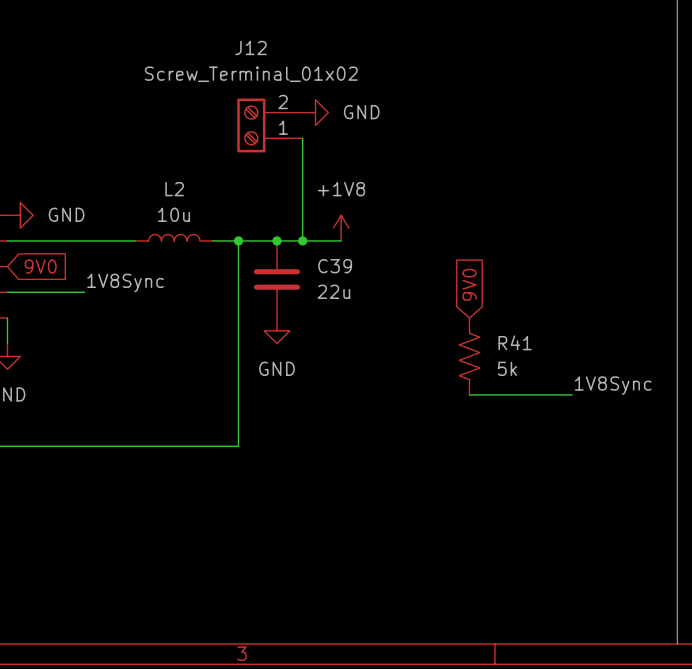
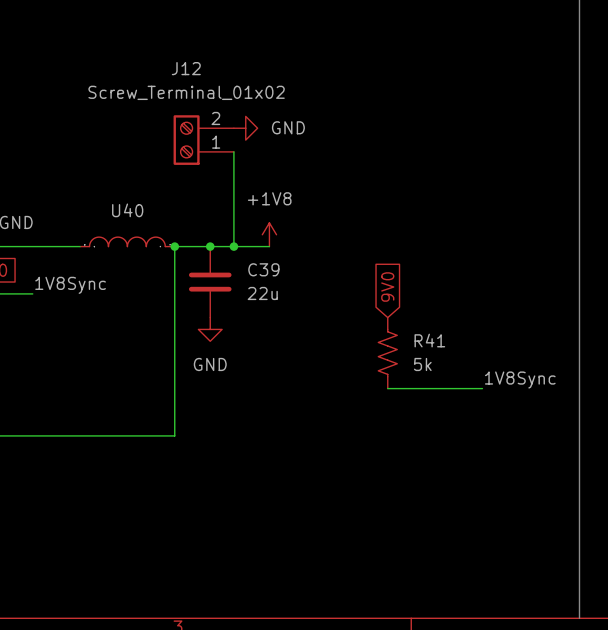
U40: none -> (127, 241)
L2: 10u (174, 237) -> none
wire: (212, 240) (238, 240) -> none

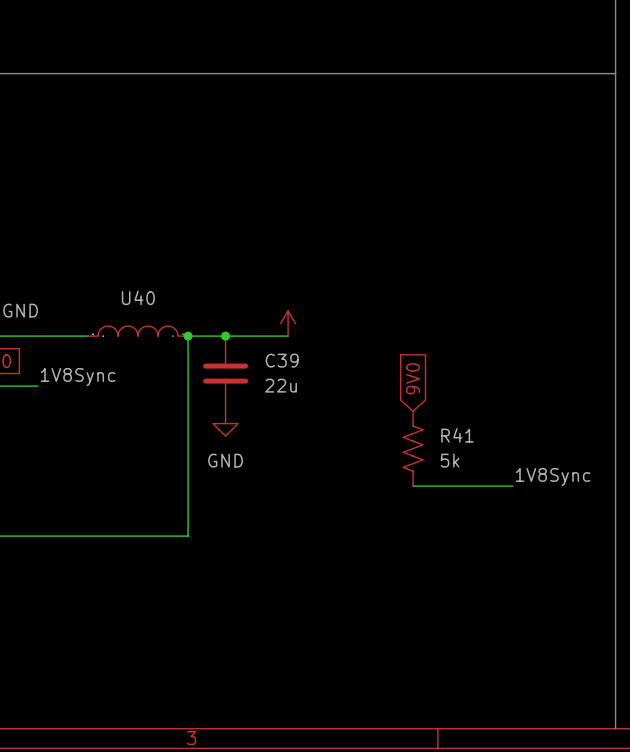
power symbol: GND (245, 128) -> none
J12: Screw_Terminal_01x02 (203, 140) -> none
wire: (233, 151) (233, 246) -> none
power symbol text: +1V8 (269, 198) -> none
junction: (233, 246) -> none

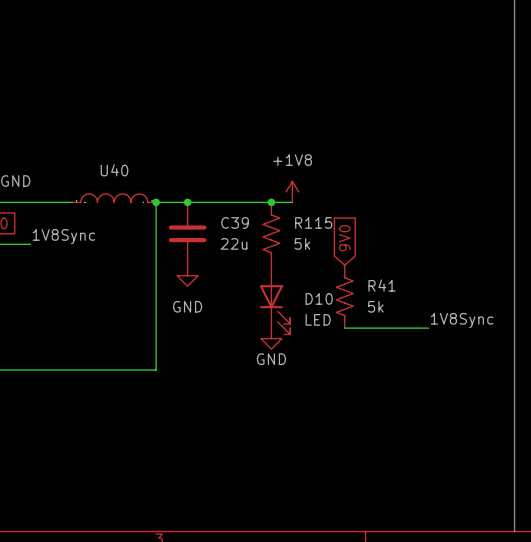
power symbol: (288, 323) -> none
power symbol: none -> +1V8 (292, 191)
wire: none -> (239, 202) (292, 202)
junction: none -> (271, 202)
R115: none -> 5k (271, 233)
D10: none -> LED (275, 299)
power symbol: none -> GND (271, 338)

